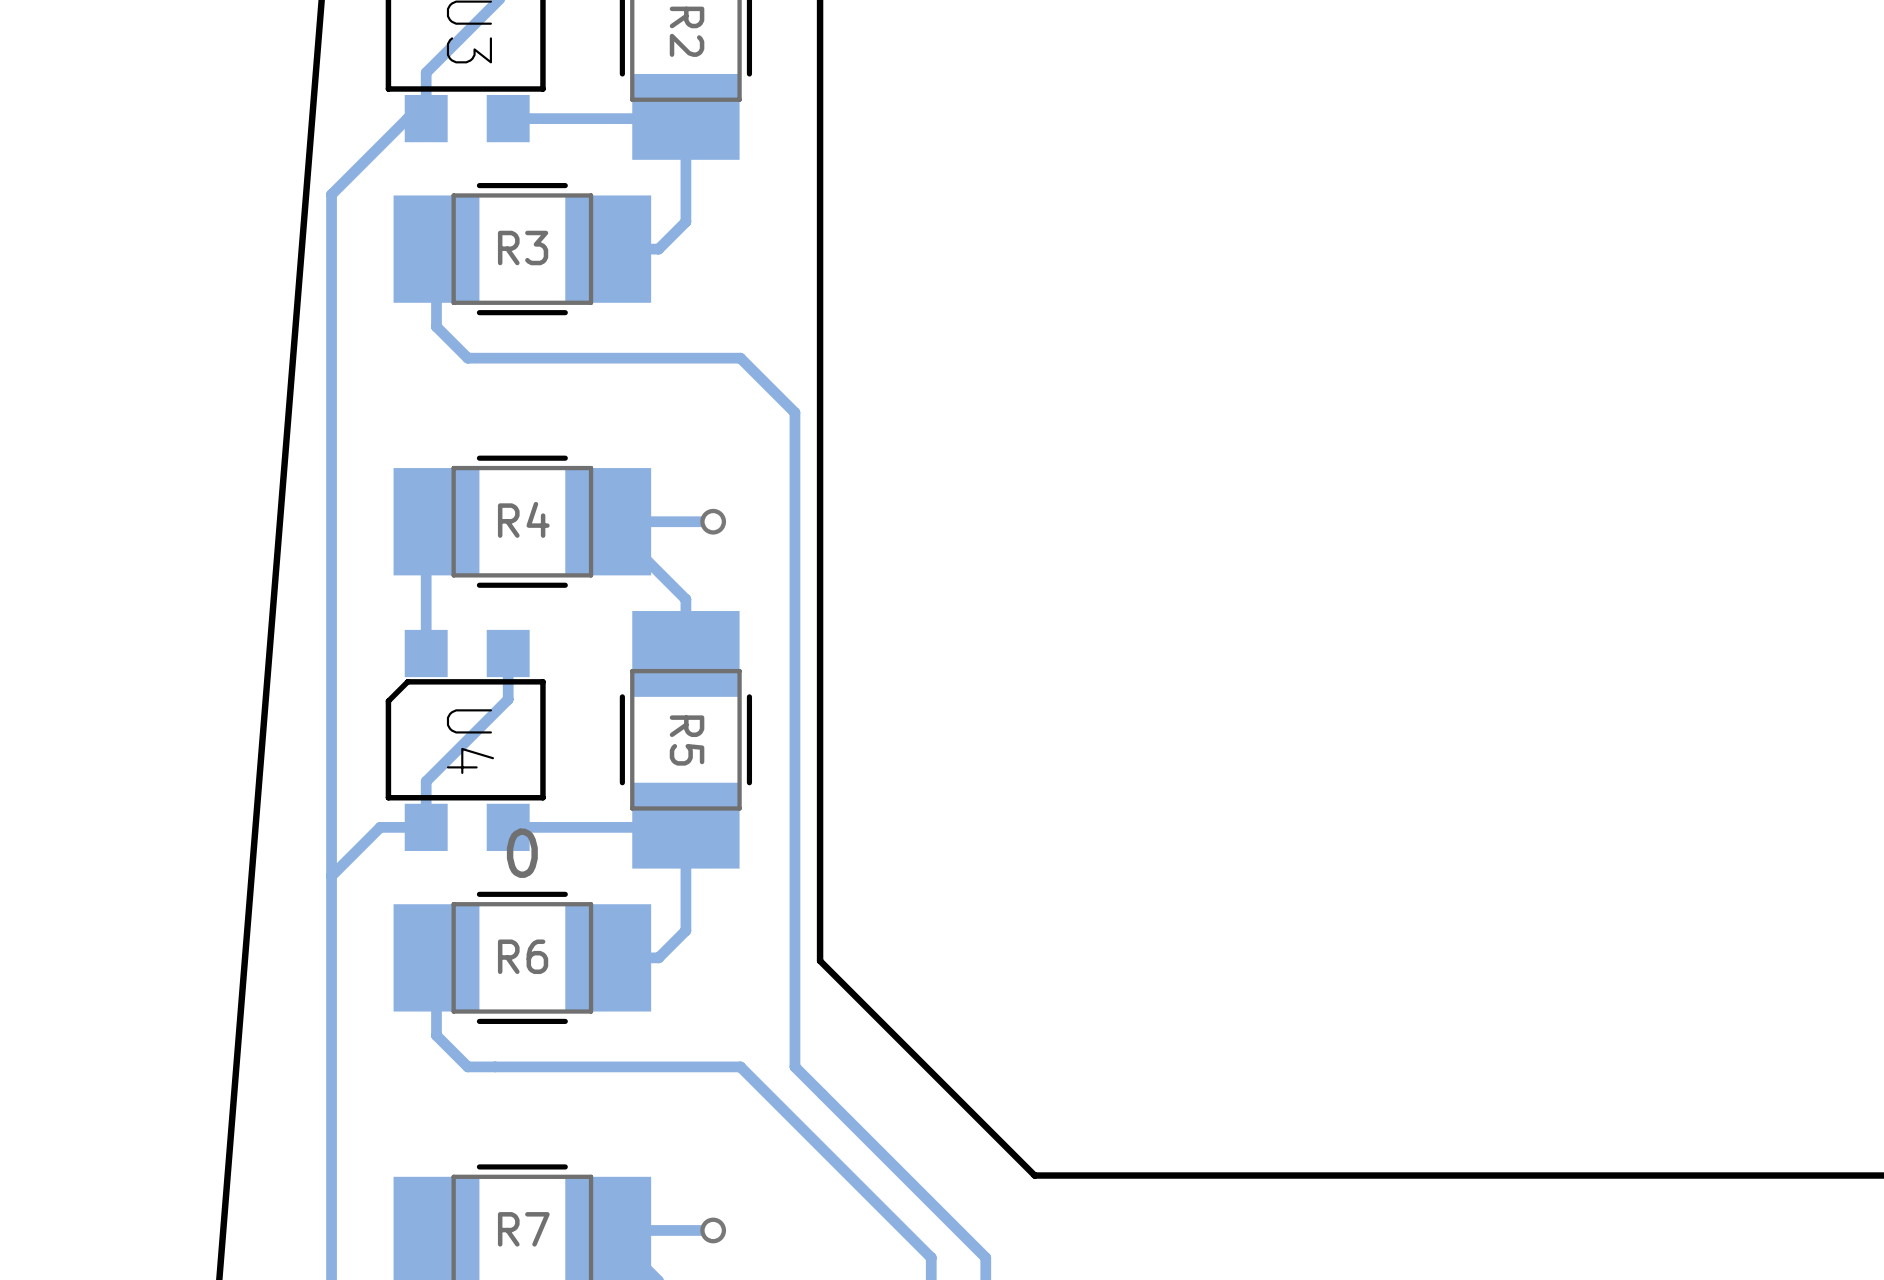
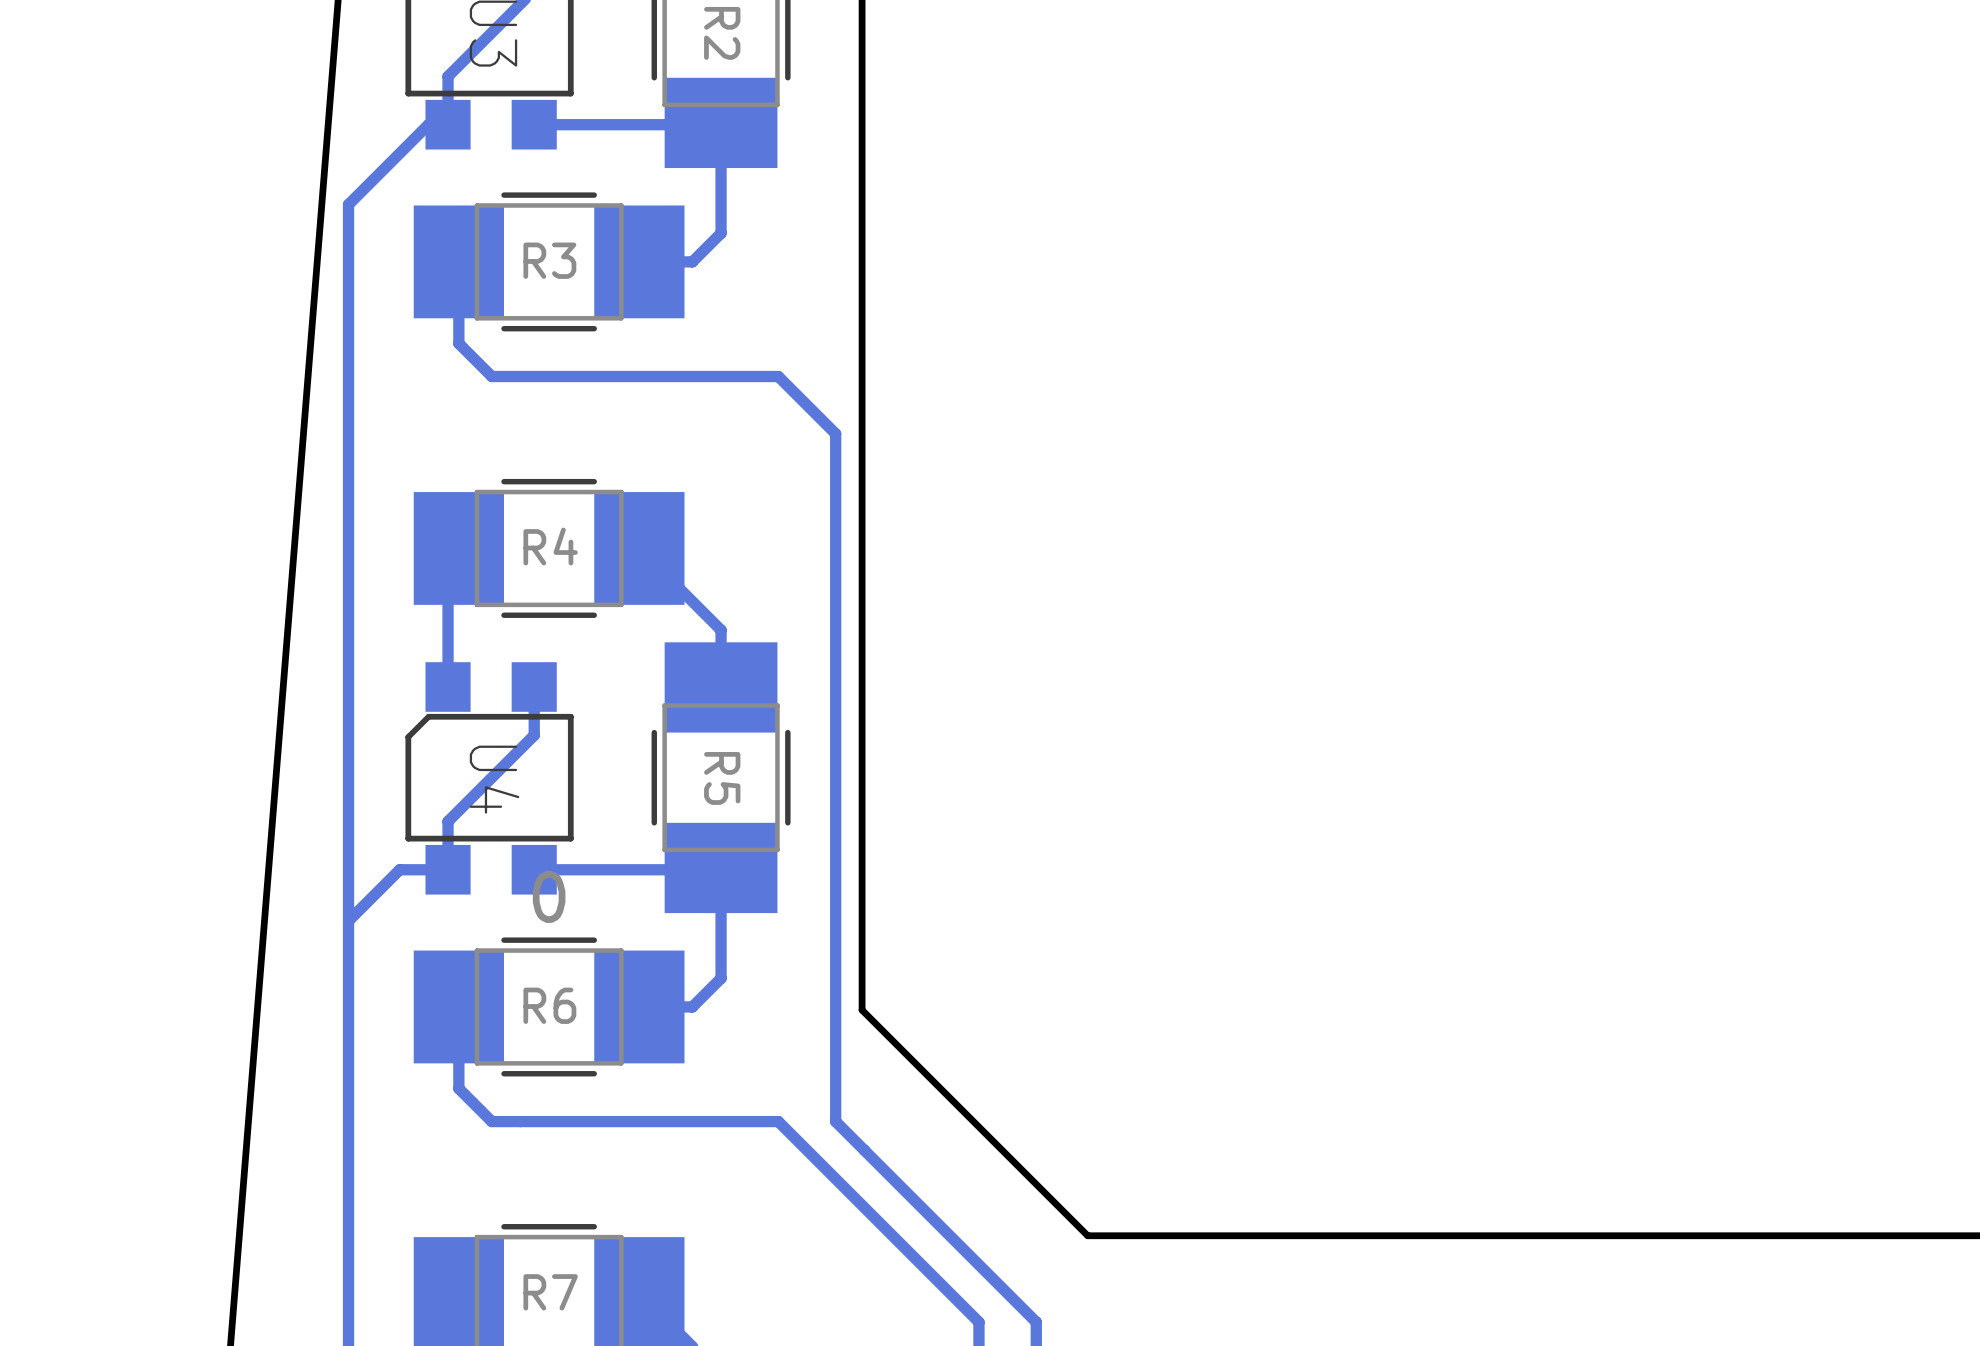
track: (713, 521) (608, 521) -> none
via: (713, 521) -> none
track: (713, 1230) (608, 1230) -> none
via: (713, 1230) -> none

